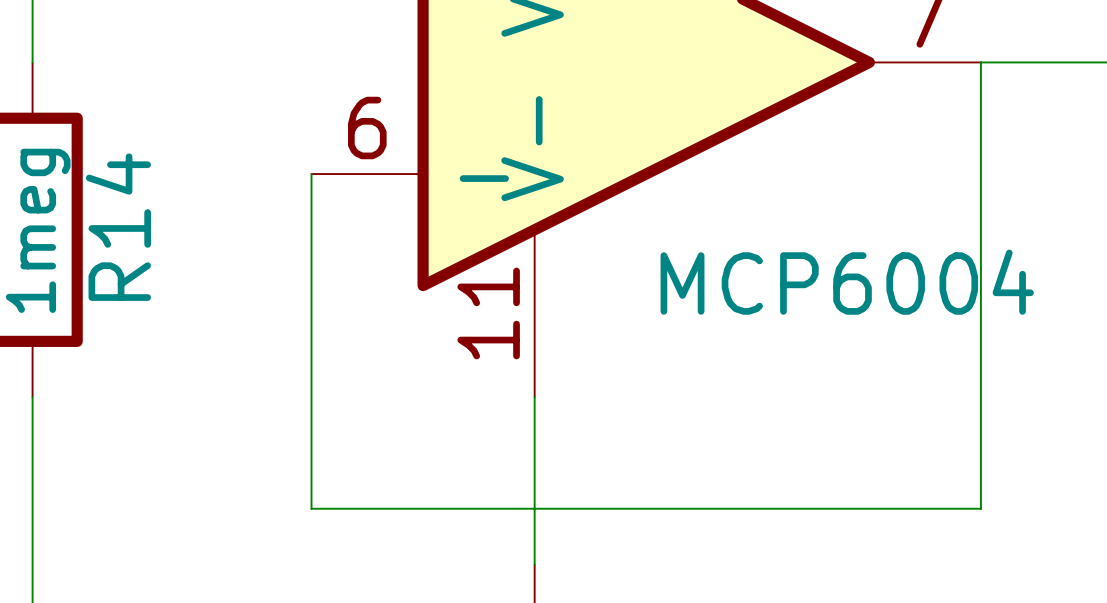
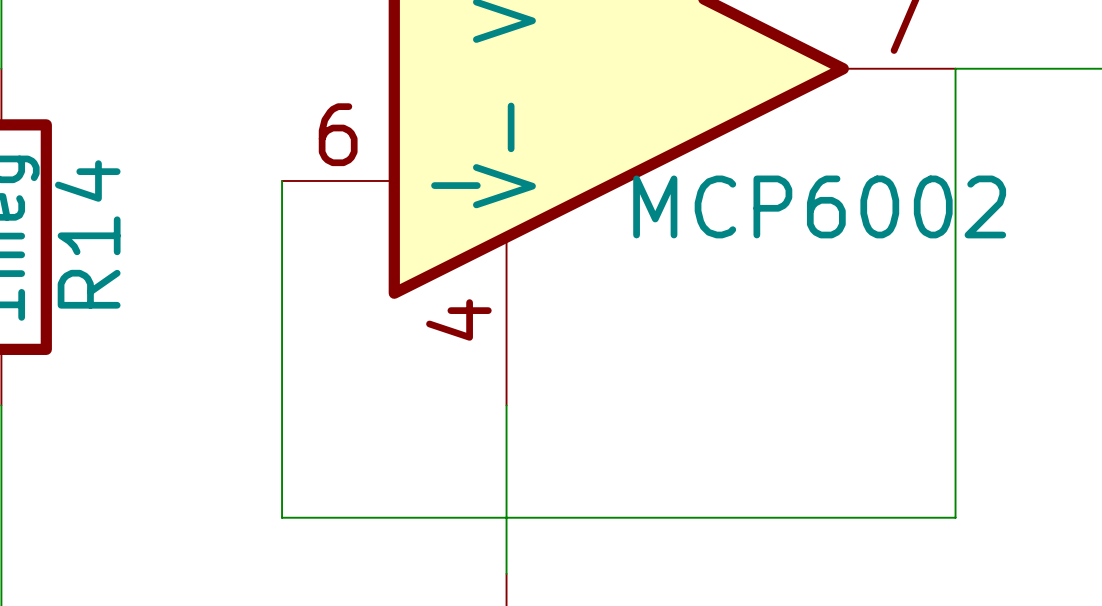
part value: MCP6004 (847, 282) -> MCP6002 (819, 206)
part pin number: 11 (488, 313) -> 4 (458, 319)

